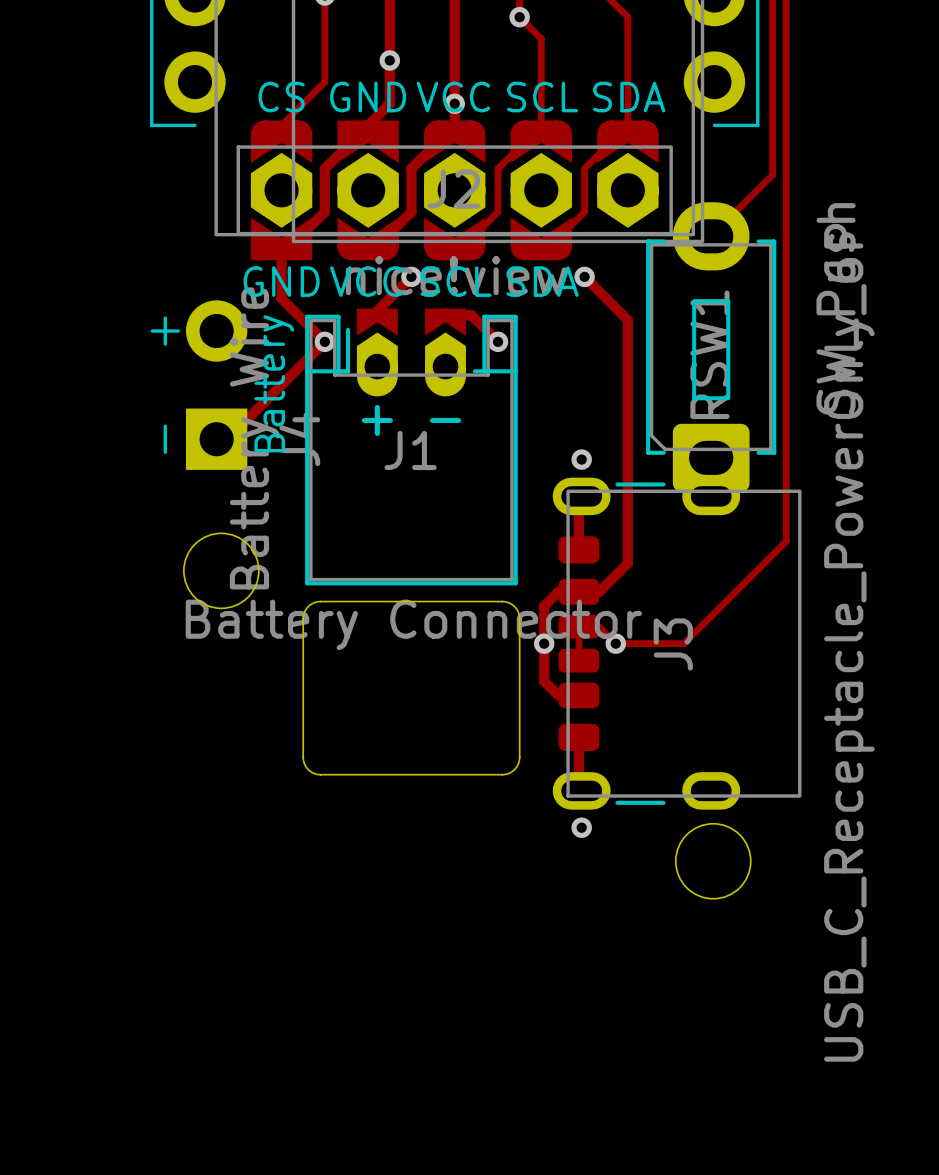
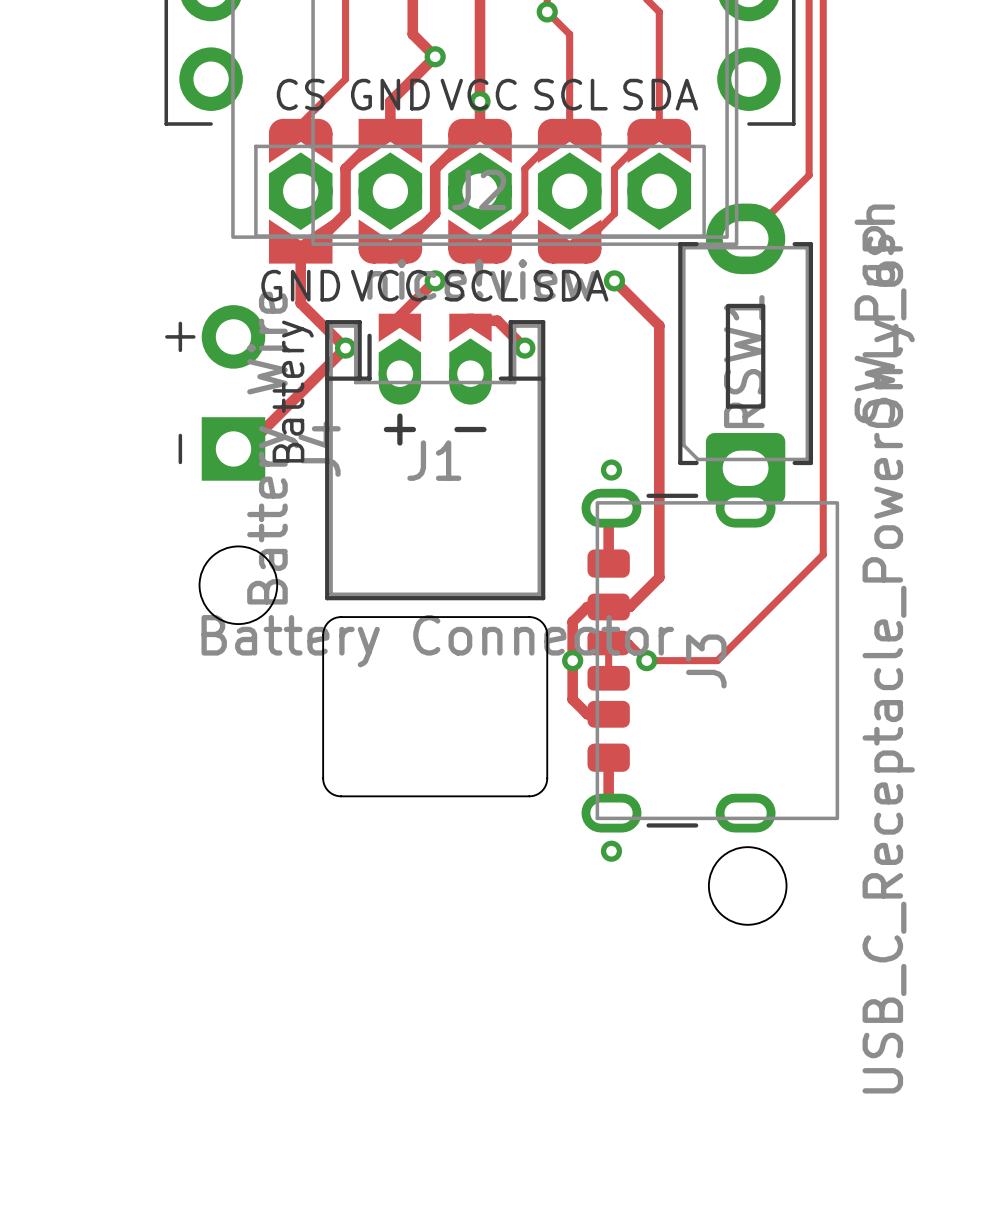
track: (389, 38) (389, 103) (368, 125) -> (412, 34) (435, 56) (390, 101) (390, 123)
via position: (389, 60) -> (435, 56)

